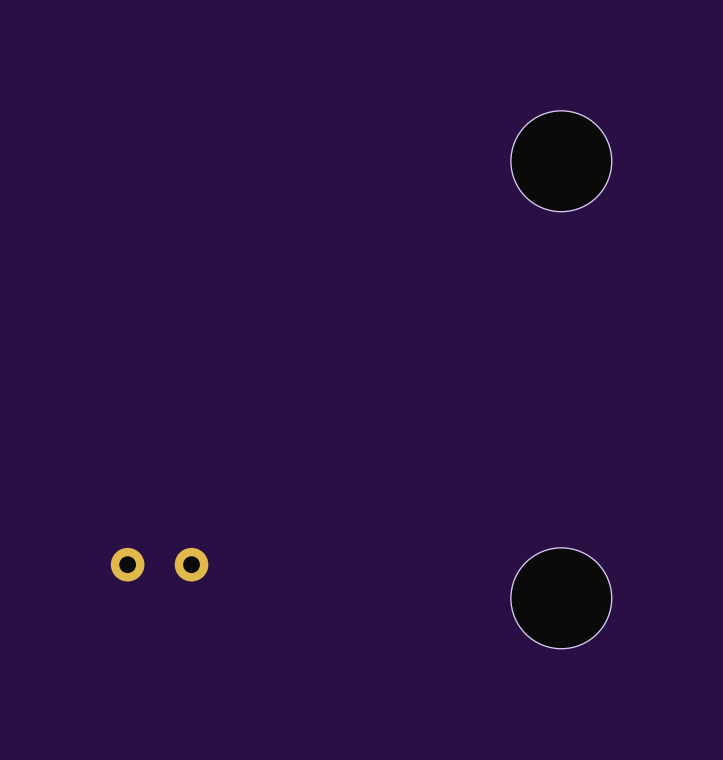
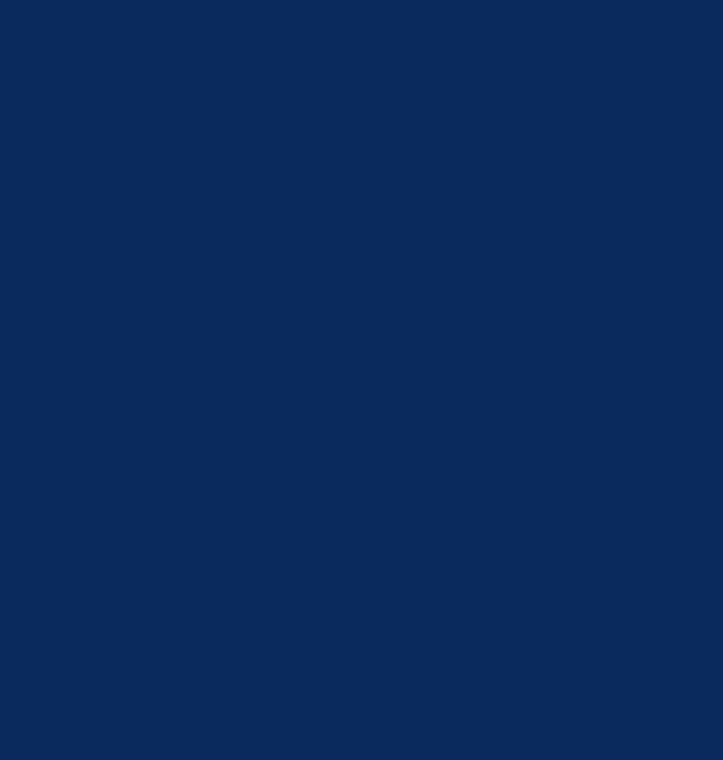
part: (561, 161) -> none
part: (159, 564) -> none
part: (561, 598) -> none

